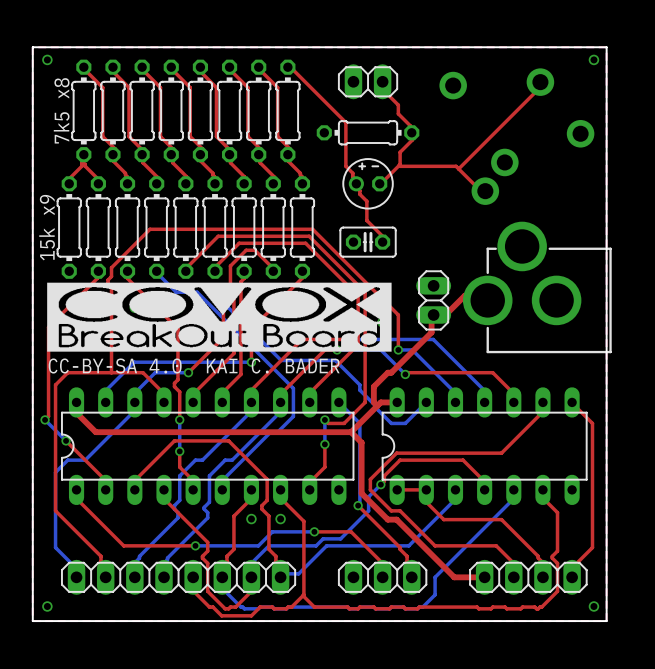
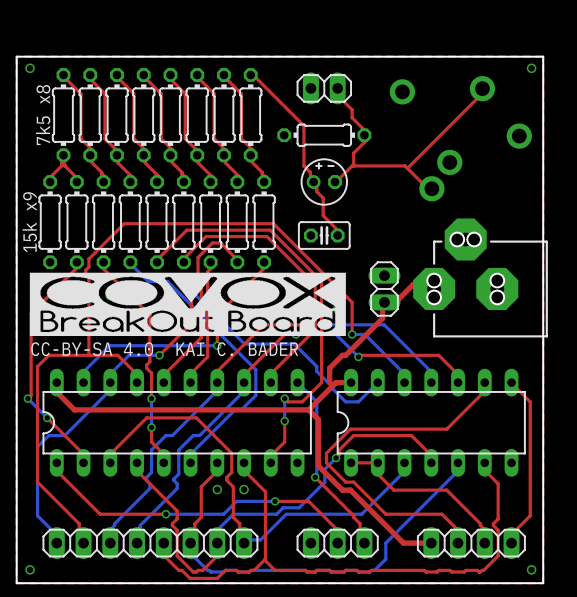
part footprint: [462, 221, 612, 354] -> [413, 218, 548, 338]

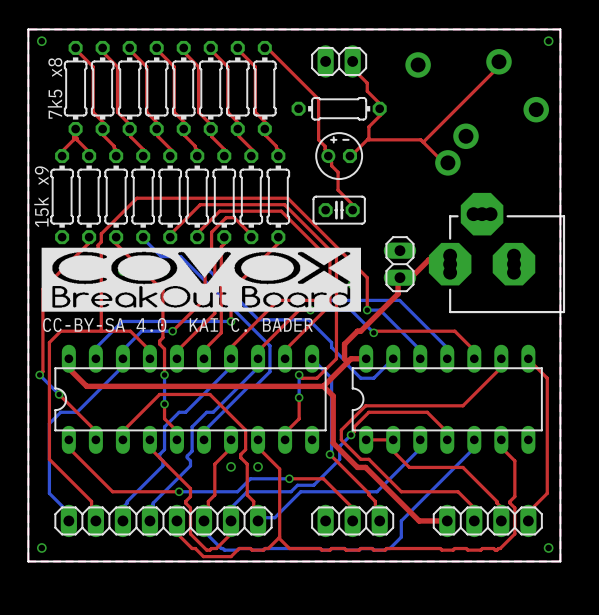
part footprint: [413, 218, 548, 338] -> [428, 192, 566, 314]

